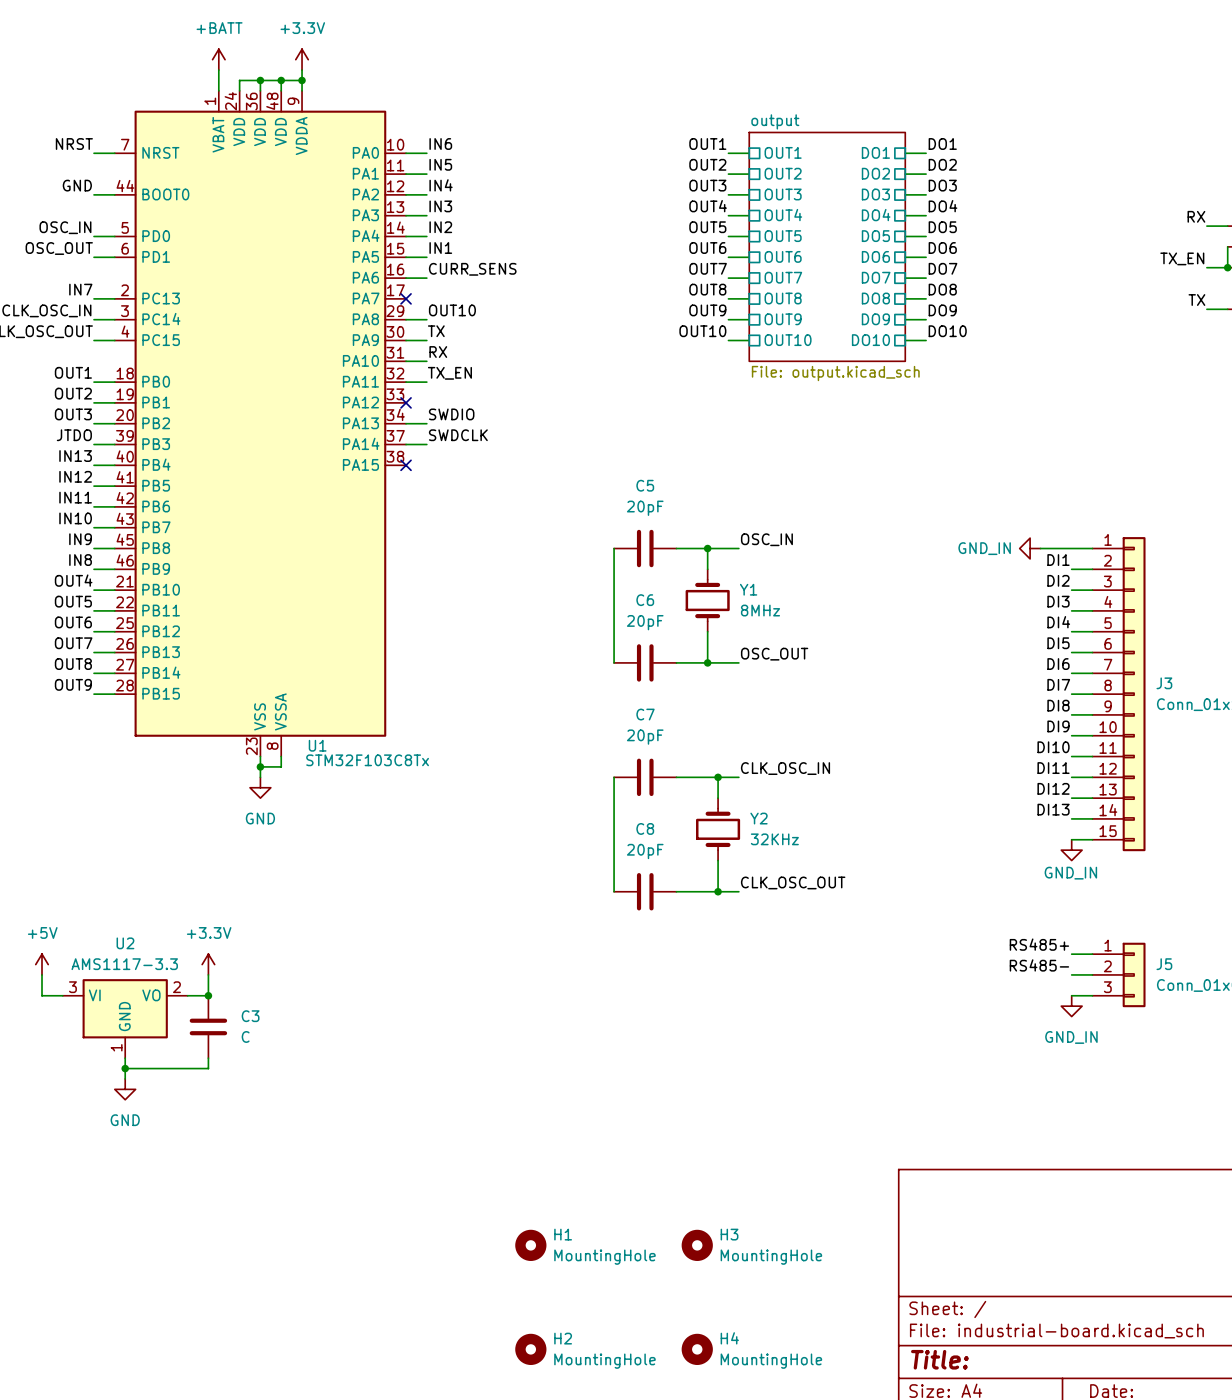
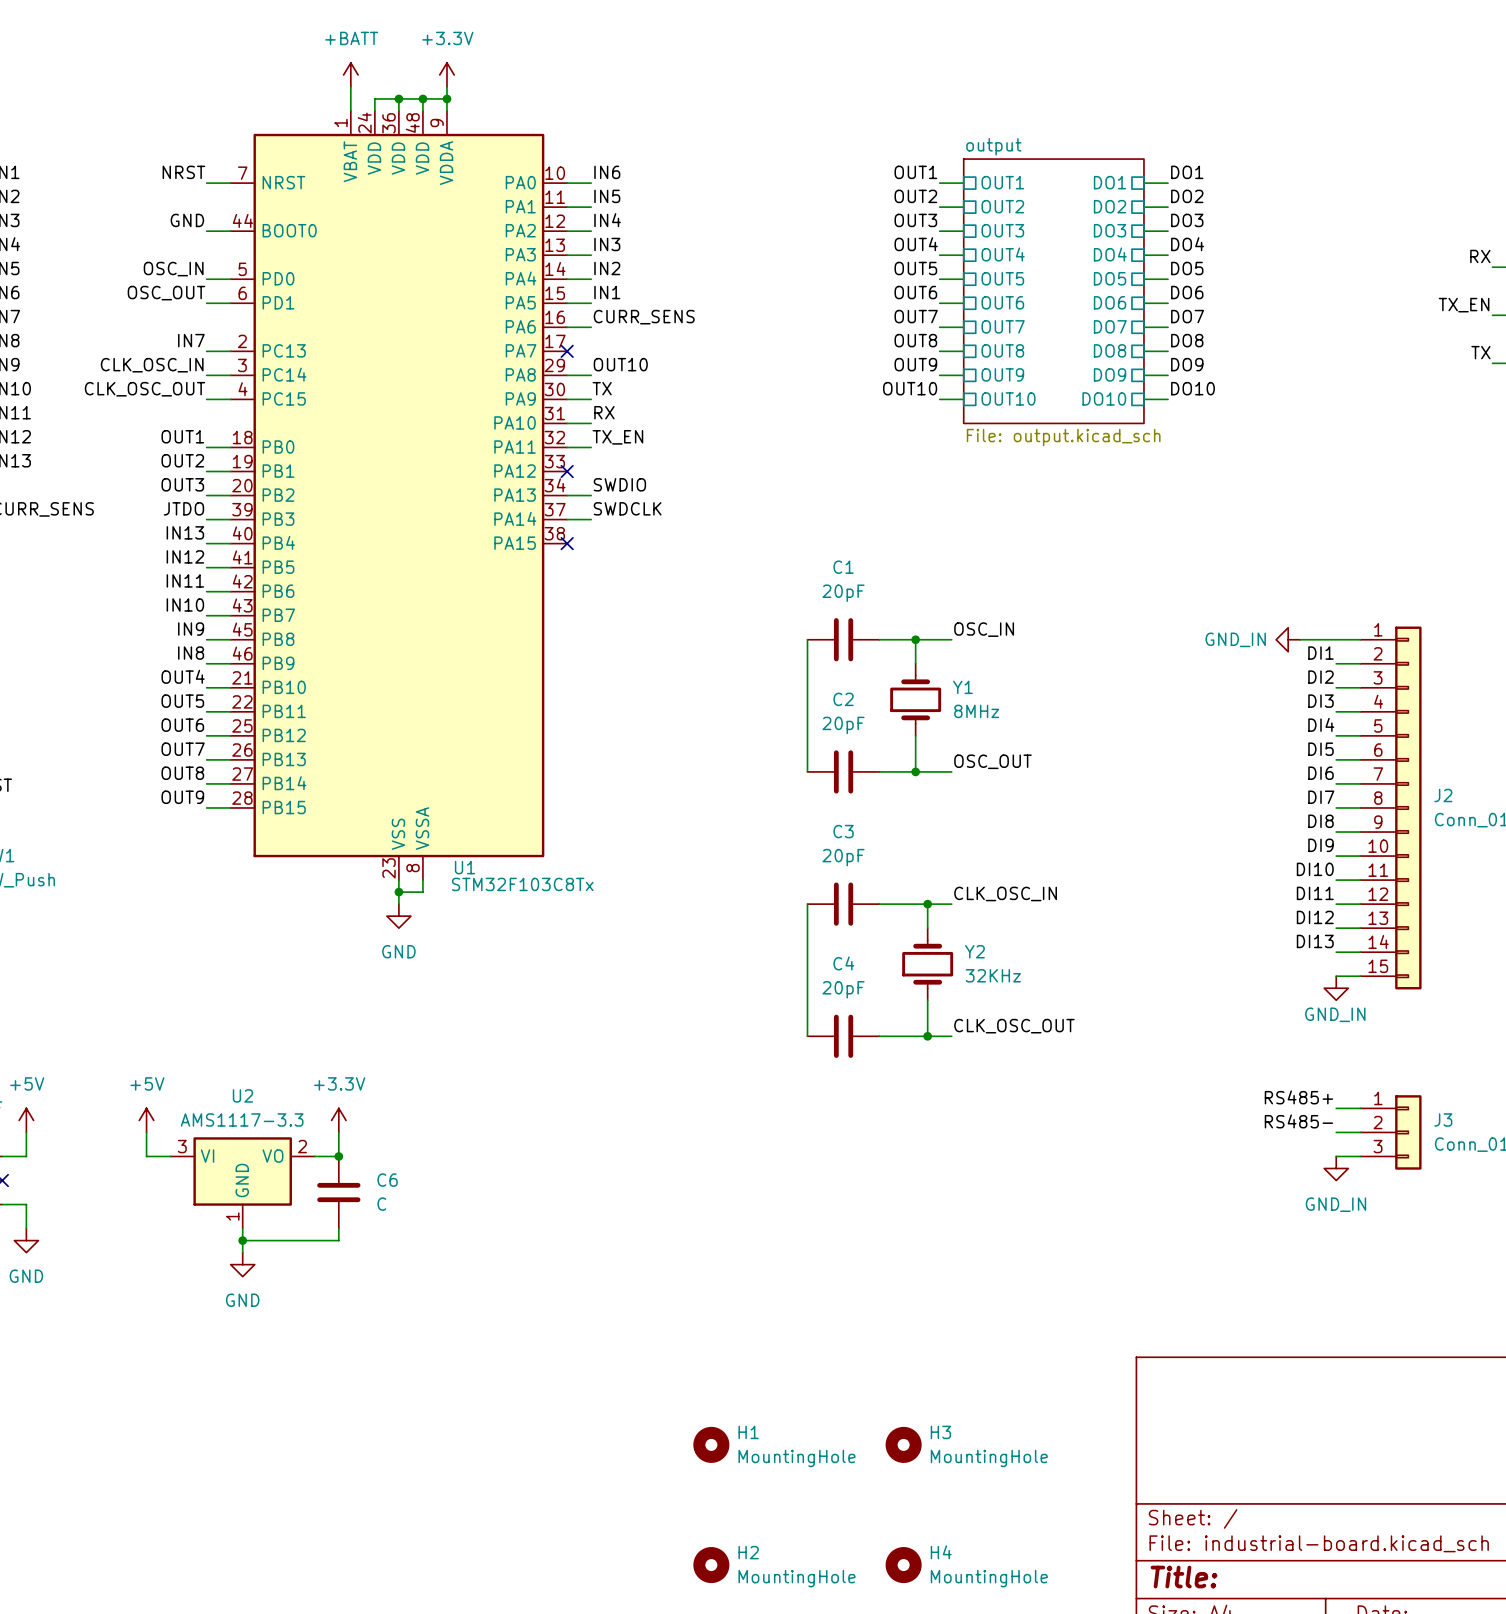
C5 name: C5 (645, 485) -> C1 (843, 567)
C6 name: C6 (645, 600) -> C2 (843, 699)
J3 name: J3 (1164, 683) -> J2 (1443, 795)
C7 name: C7 (645, 714) -> C3 (843, 831)
C8 name: C8 (645, 828) -> C4 (843, 963)
J5 name: J5 (1164, 964) -> J3 (1443, 1119)
C3 name: C3 (250, 1016) -> C6 (387, 1180)

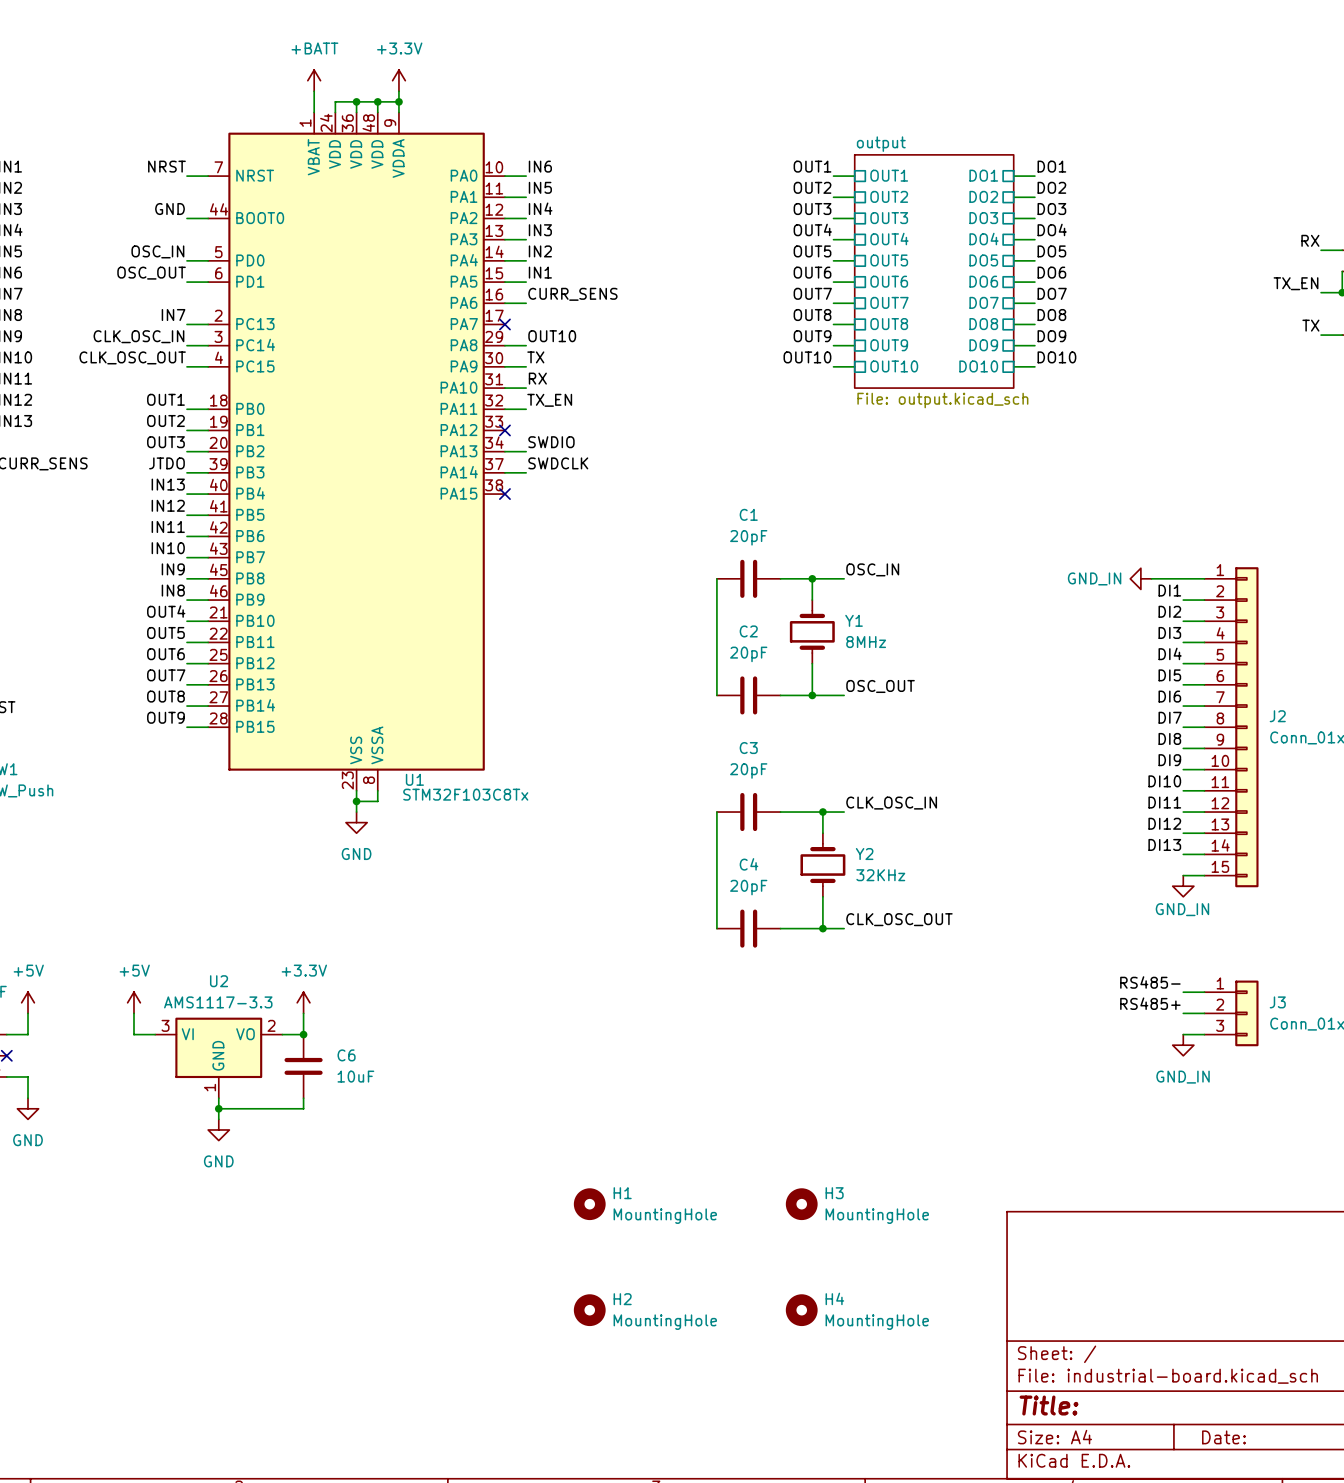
label: RS485+ (1298, 1097) -> RS485- (1150, 982)
label: RS485- (1298, 1121) -> RS485+ (1150, 1003)
C6 value: C (381, 1204) -> 10uF (355, 1076)
H1 position: (711, 1444) -> (589, 1204)
H3 position: (903, 1444) -> (801, 1204)
H2 position: (711, 1565) -> (589, 1310)
H4 position: (903, 1565) -> (801, 1310)

